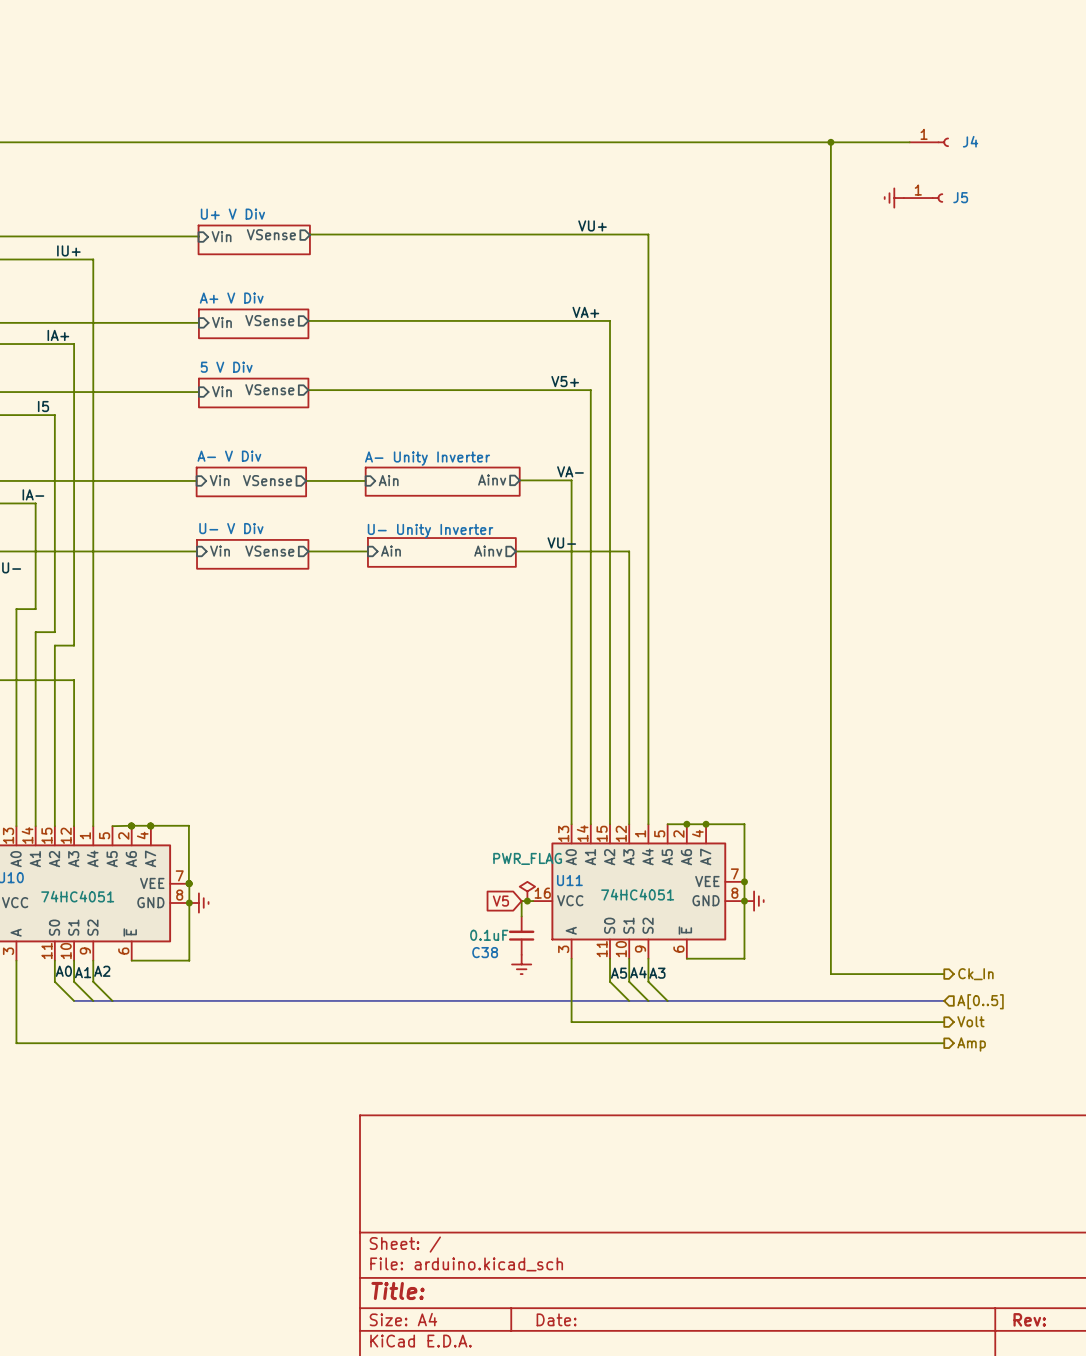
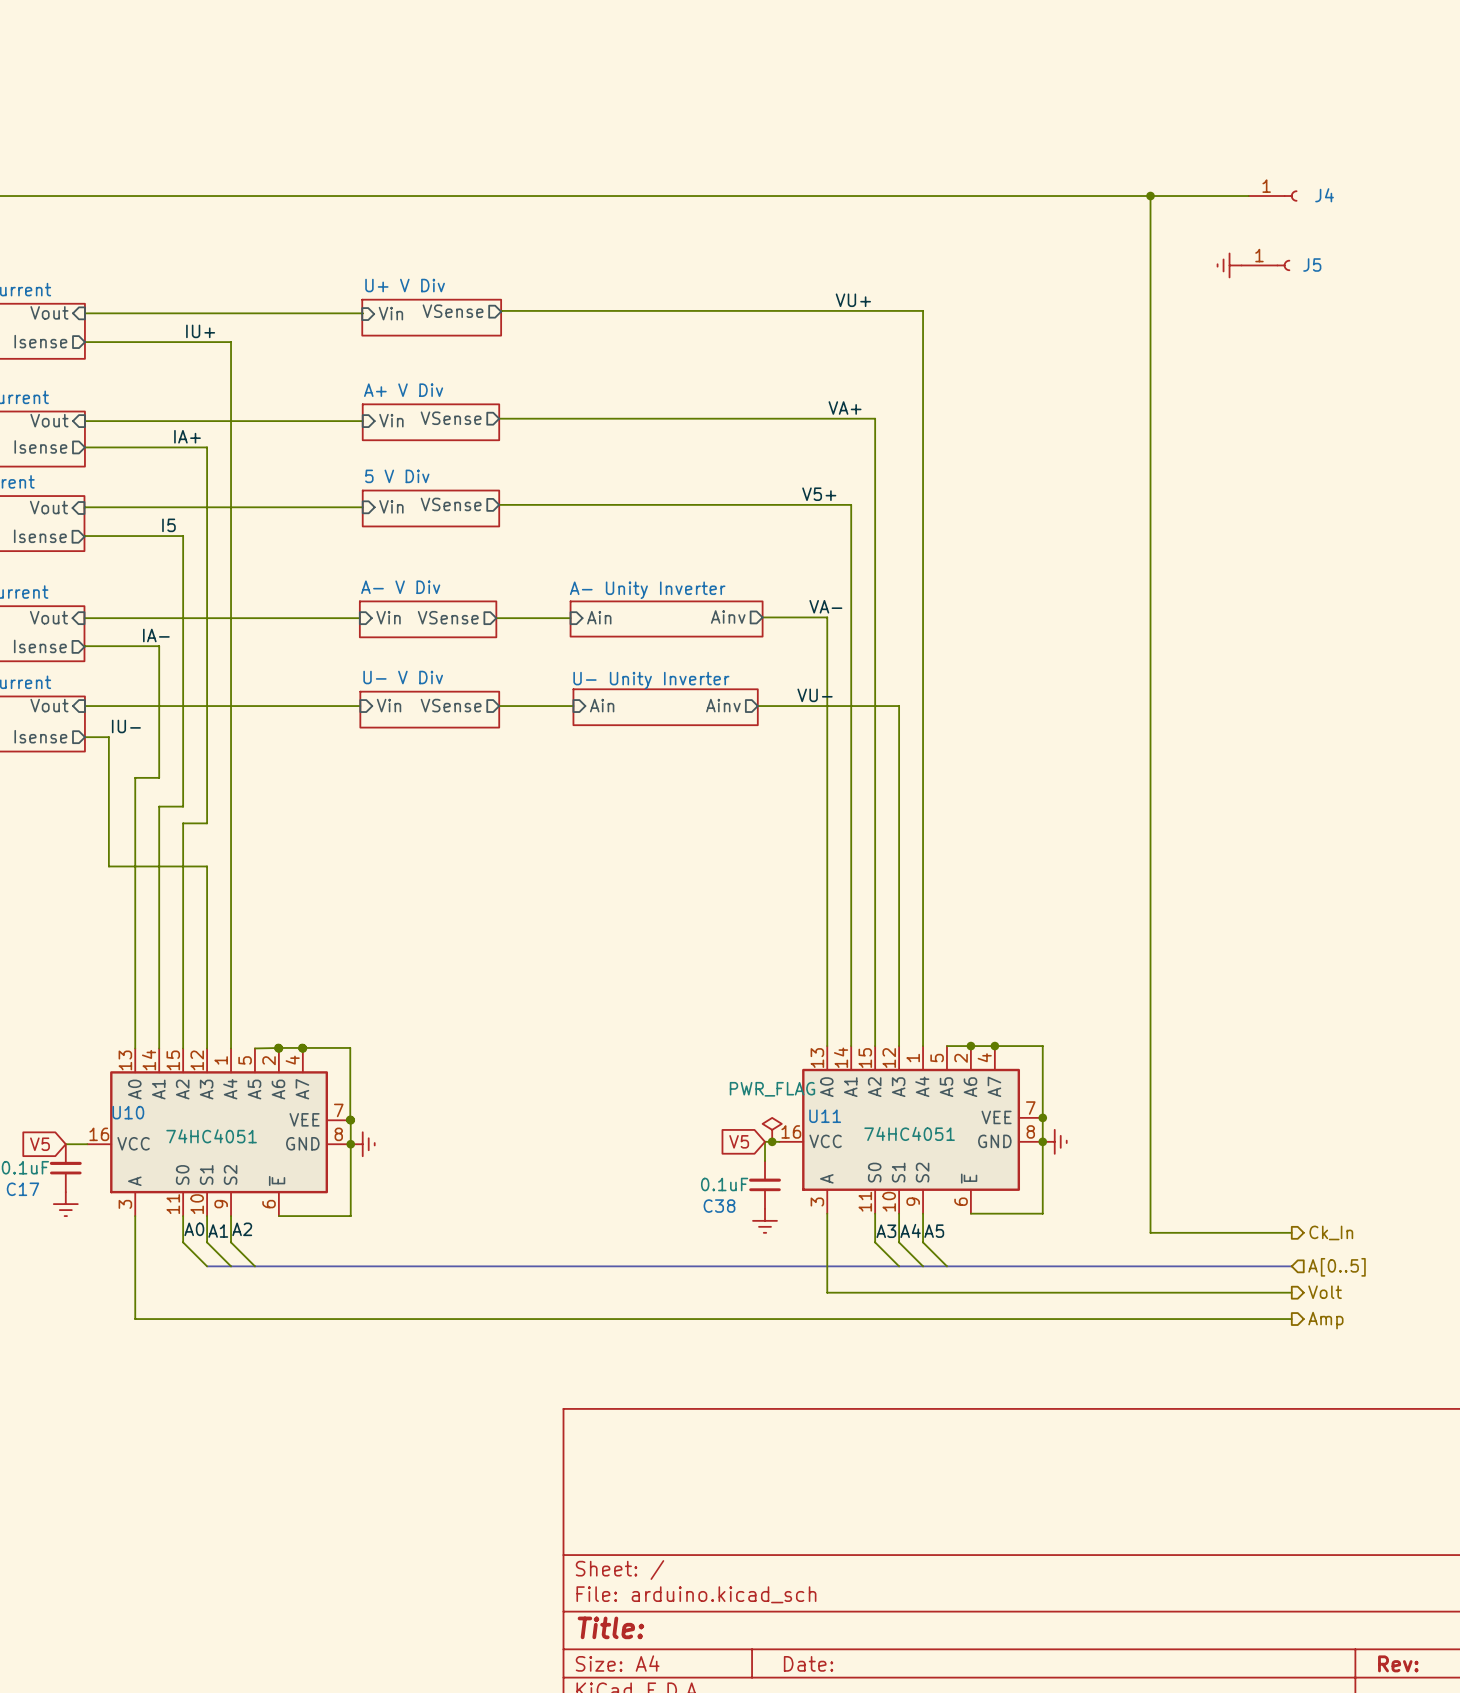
label: A5 (618, 973) -> A3 (886, 1231)
label: A3 (657, 973) -> A5 (934, 1231)

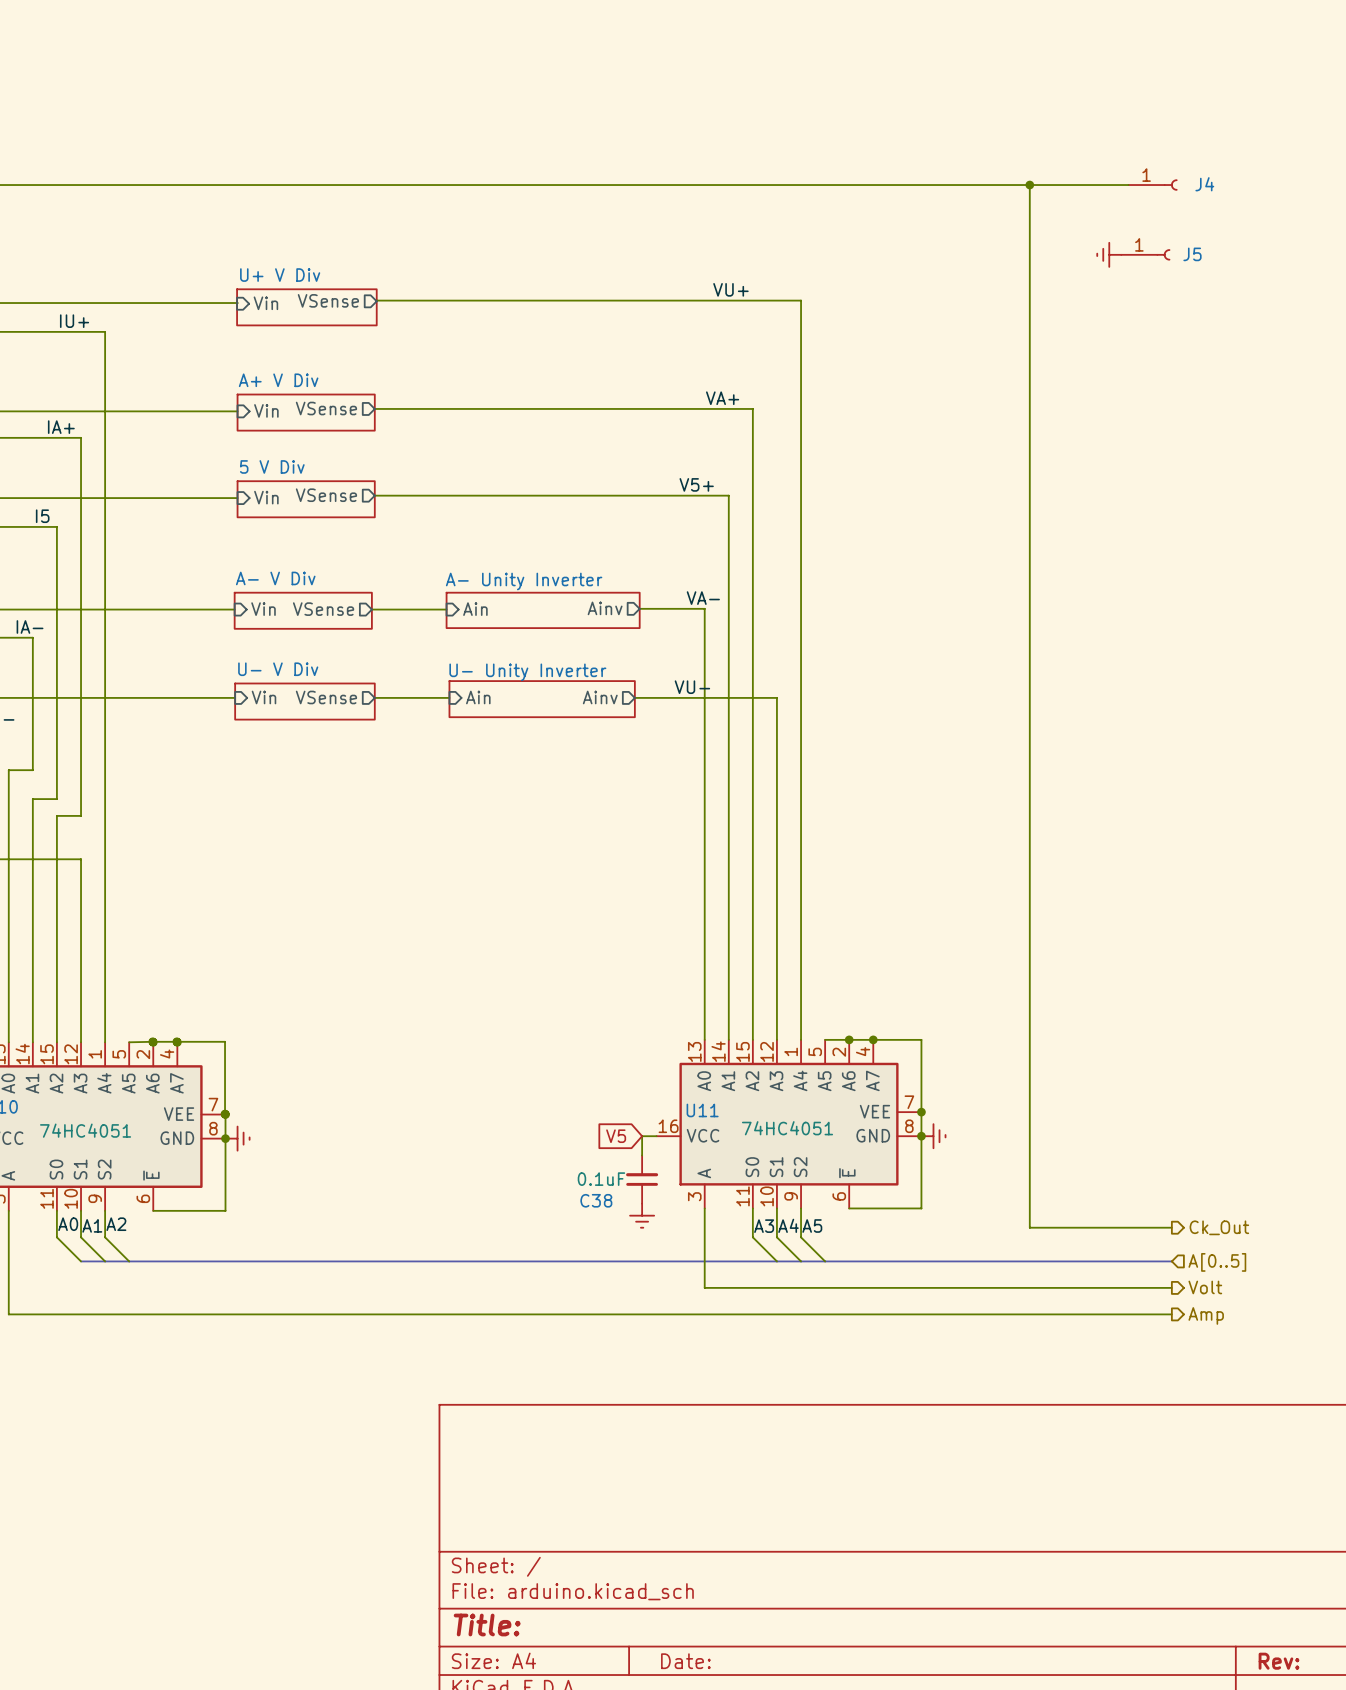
power symbol: PWR_FLAG (772, 1129) -> none
junction: (772, 1141) -> none
hierarchical label: Ck_In (1331, 1232) -> Ck_Out (1219, 1227)

